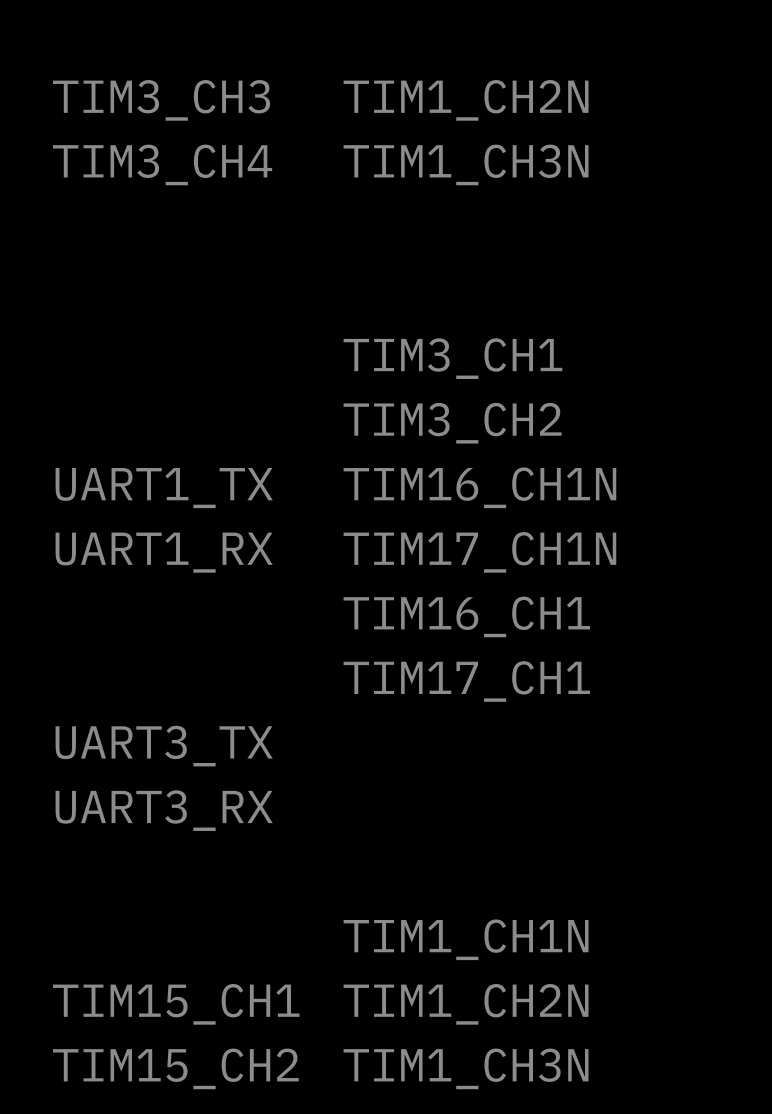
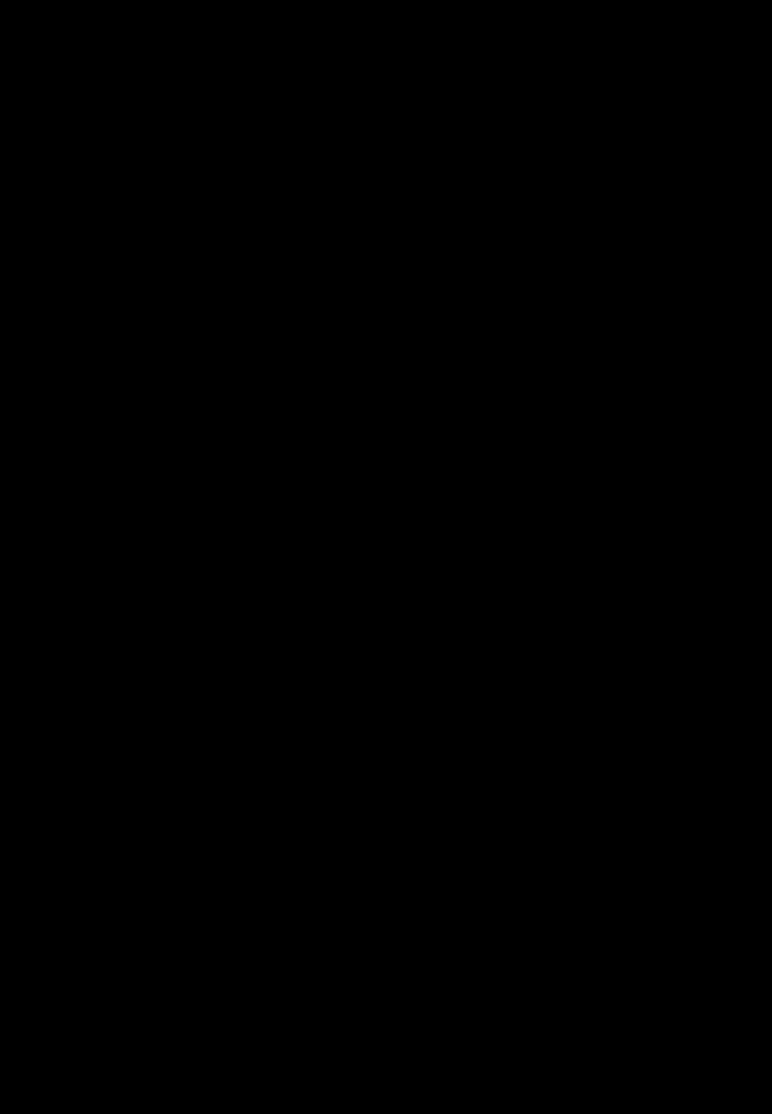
text: TIM3_CH3 (161, 100) -> none
text: TIM1_CH2N (466, 100) -> none
text: TIM3_CH4 (162, 164) -> none
text: TIM1_CH3N (466, 164) -> none
text: TIM3_CH1 (452, 358) -> none
text: TIM3_CH2 (452, 423) -> none
text: TIM16_CH1N (479, 487) -> none
text: UART1_TX (164, 488) -> none
text: UART1_RX (164, 552) -> none
text: TIM17_CH1N (479, 552) -> none
text: TIM16_CH1 (466, 616) -> none
text: TIM17_CH1 (466, 681) -> none
text: UART3_TX (164, 746) -> none
text: UART3_RX (164, 810) -> none
text: TIM1_CH1N (466, 939) -> none
text: TIM15_CH1 (176, 1004) -> none
text: TIM1_CH2N (466, 1004) -> none
text: TIM15_CH2 (175, 1068) -> none
text: TIM1_CH3N (466, 1068) -> none

